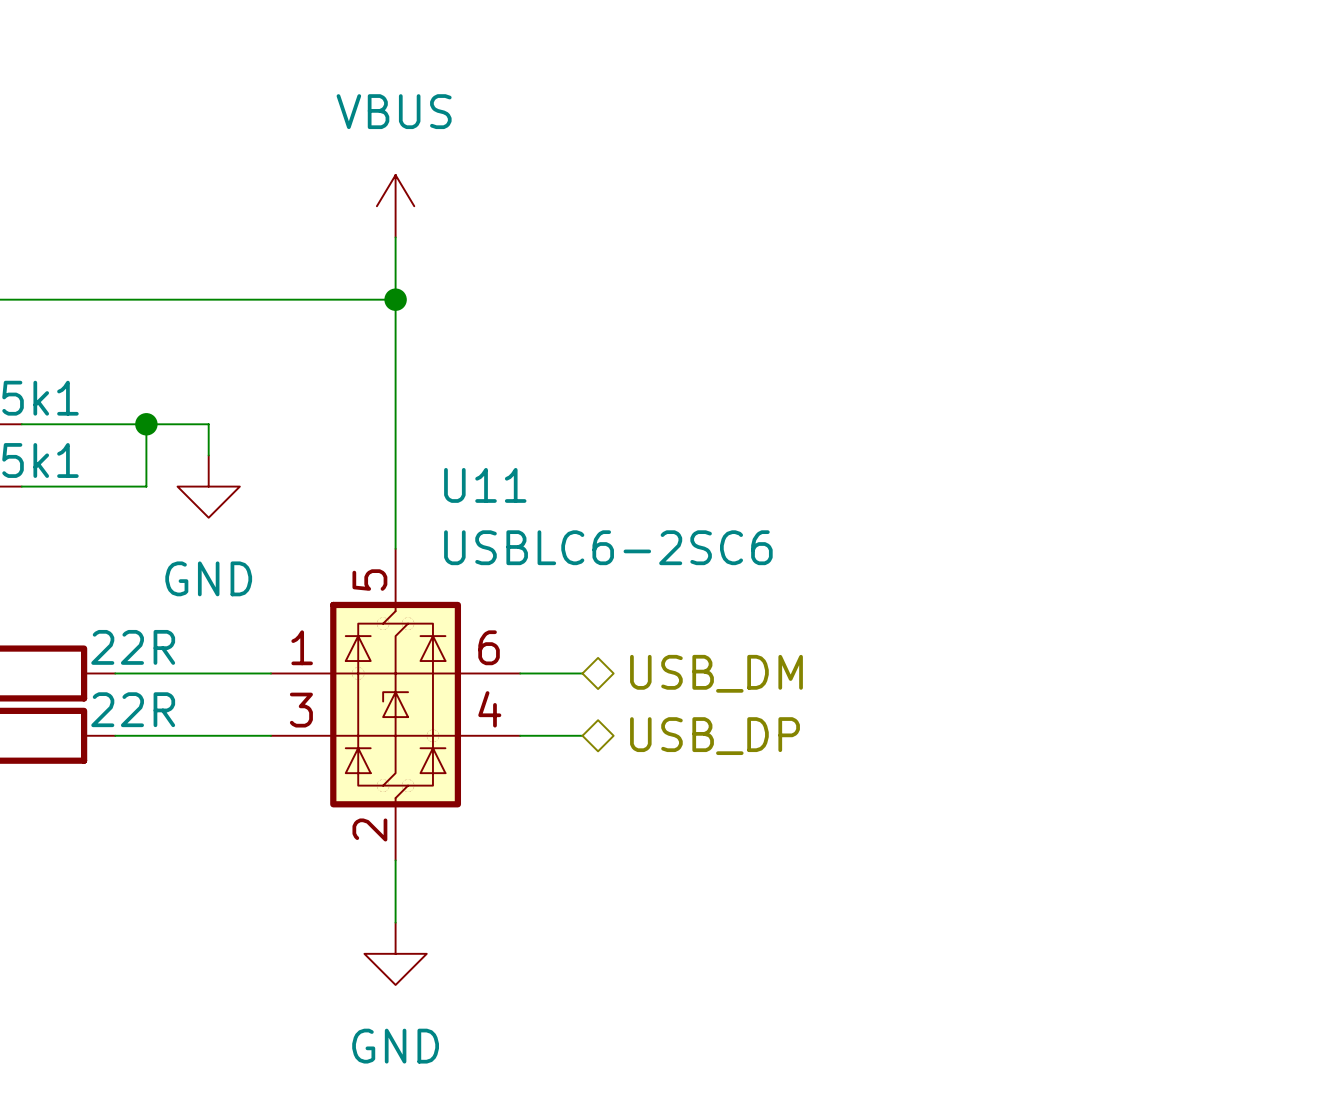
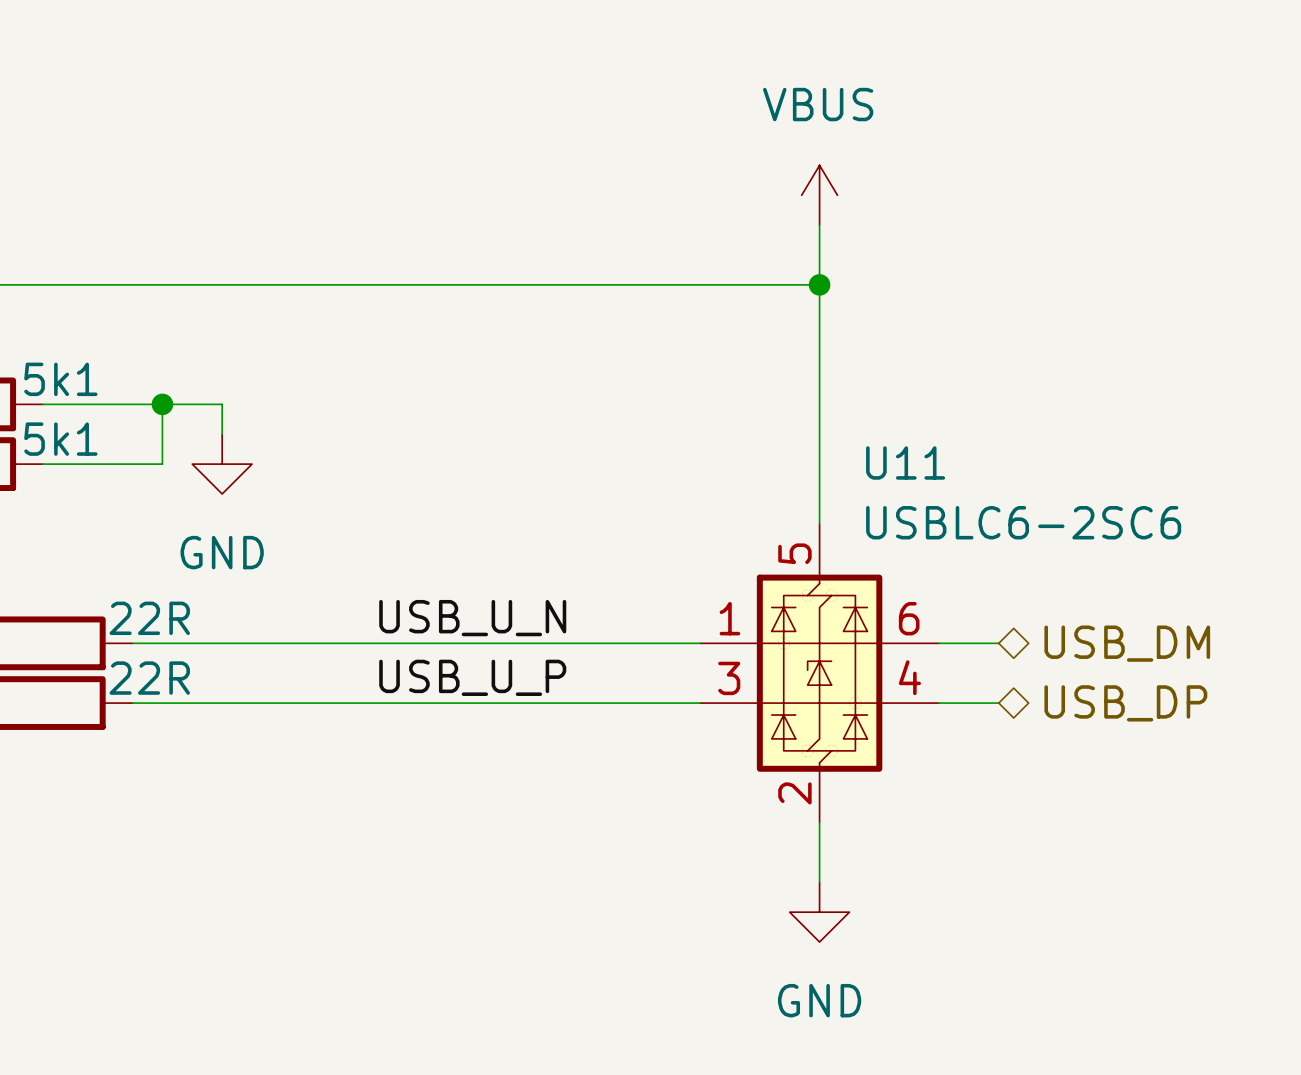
power symbol position: VBUS (395, 206) -> VBUS (819, 195)
wire: (395, 237) (395, 548) -> (819, 225) (819, 523)
wire: none -> (401, 284) (819, 284)
junction: (395, 299) -> none
junction: none -> (819, 284)
label: none -> USB_U_N (472, 618)
wire: none -> (580, 643) (700, 643)
hierarchical label position: USB_DM (716, 673) -> USB_DM (1127, 643)
wire: none -> (939, 643) (998, 643)
U11 position: (395, 704) -> (819, 673)
label: none -> USB_U_P (472, 677)
wire: none -> (580, 703) (700, 703)
wire: none -> (939, 703) (998, 703)
hierarchical label position: USB_DP (714, 736) -> USB_DP (1125, 703)
wire: (395, 860) (395, 922) -> (819, 822) (819, 882)
power symbol position: GND (395, 953) -> GND (819, 912)

